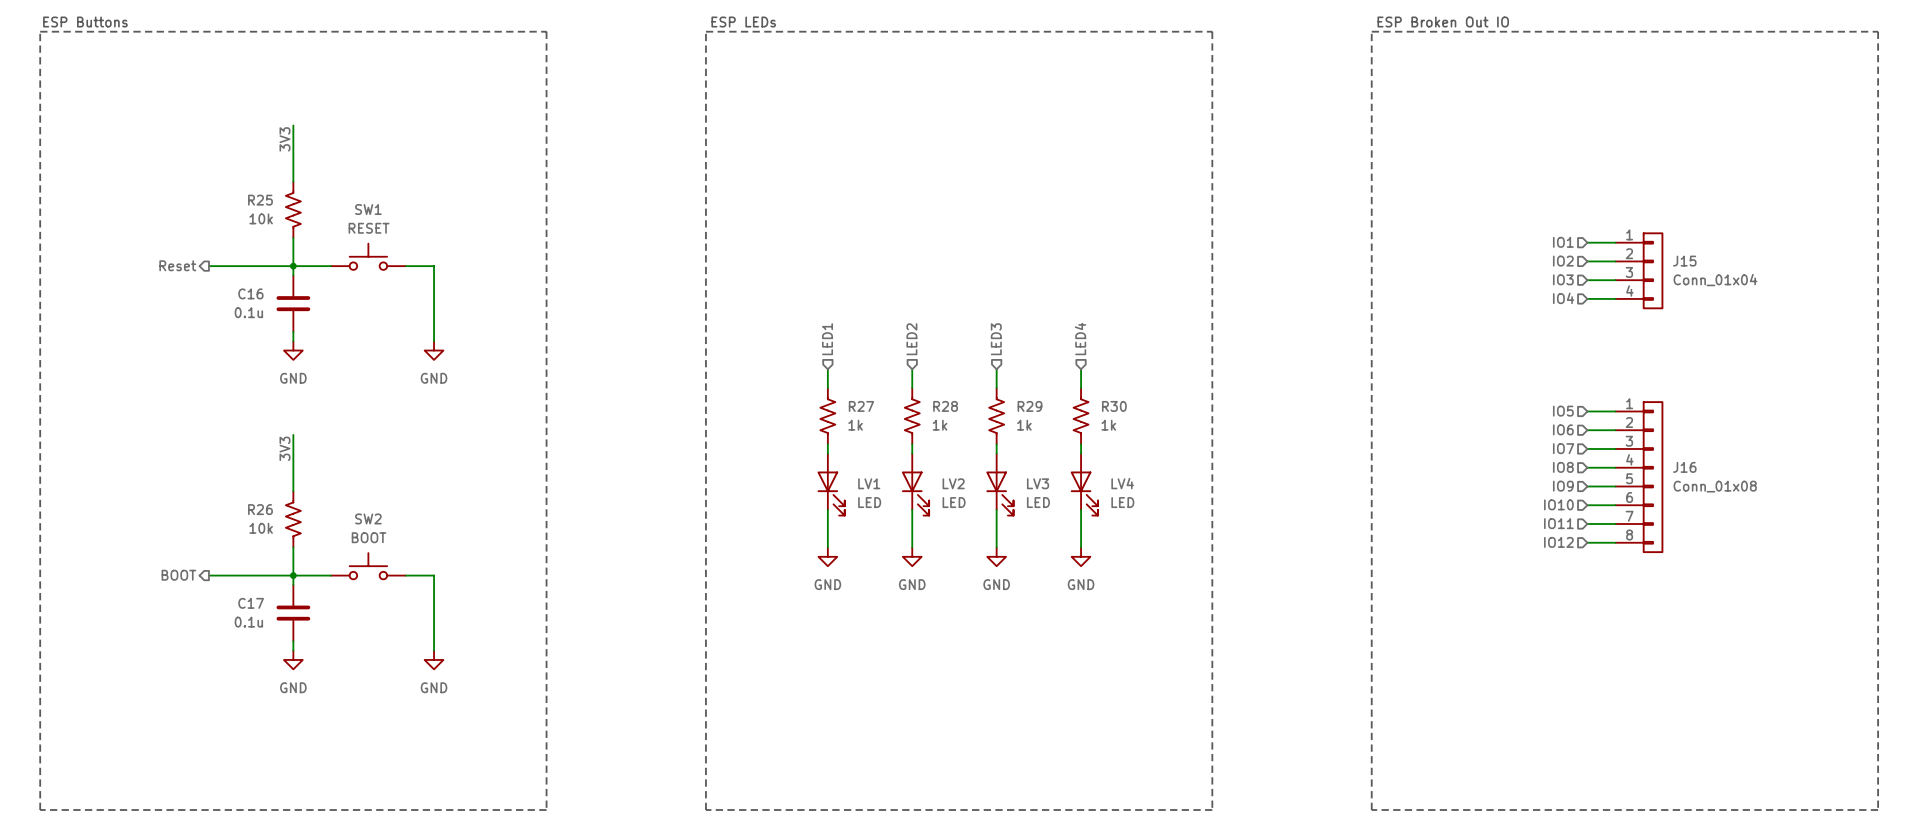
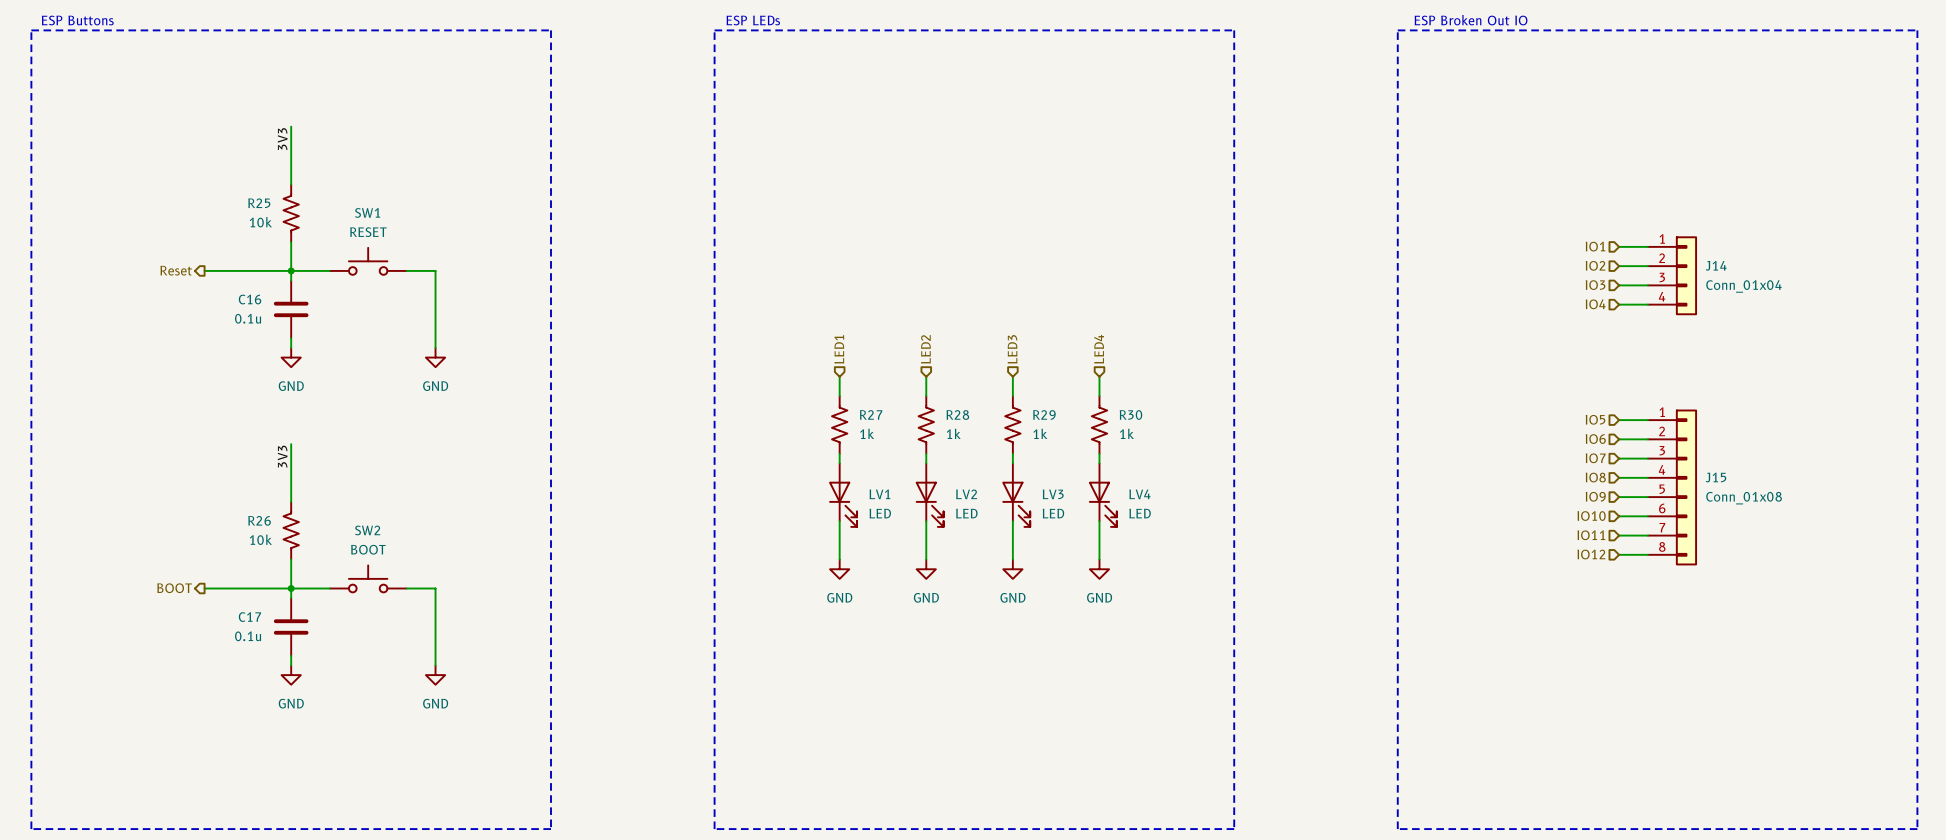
J15 name: J15 (1684, 261) -> J14 (1716, 265)
J16 name: J16 (1684, 467) -> J15 (1715, 477)

